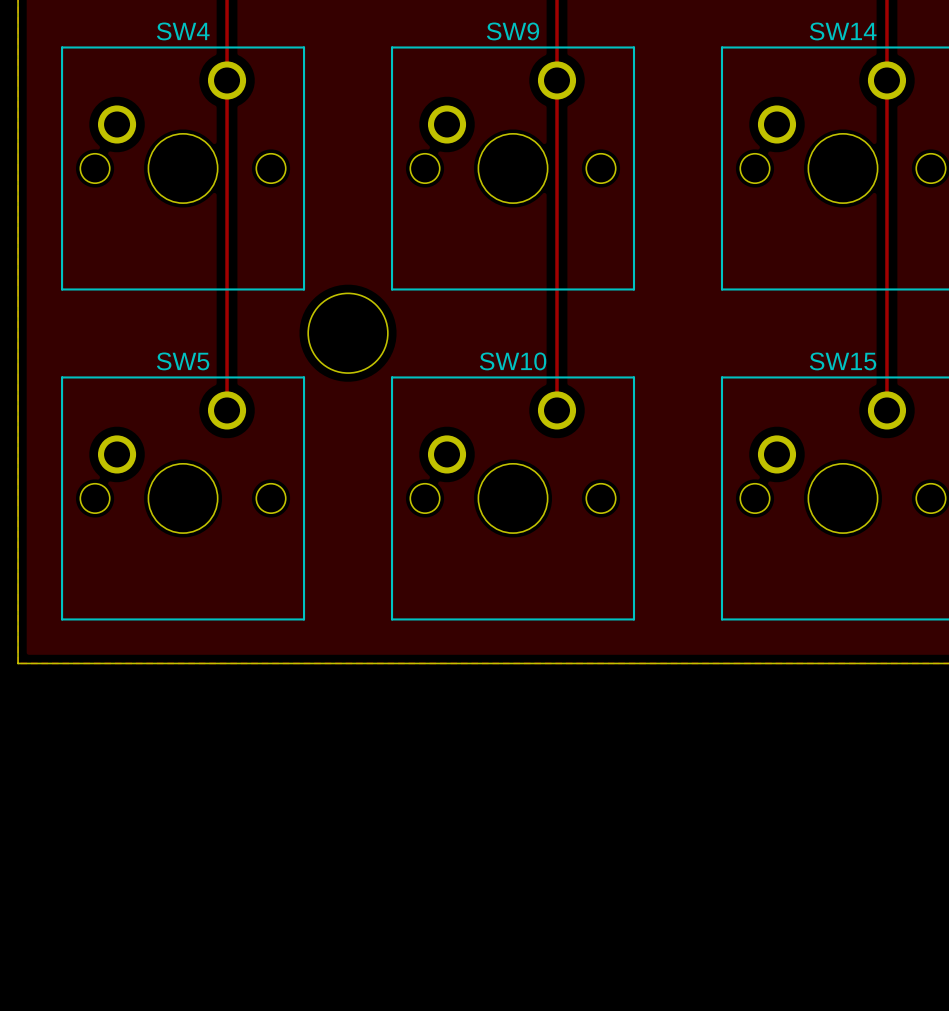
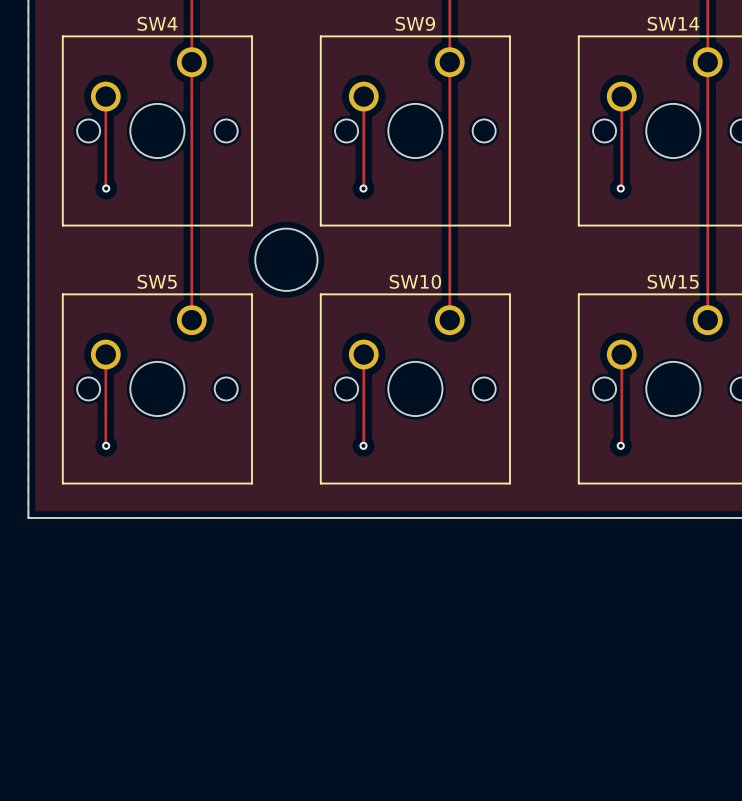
track: none -> (105, 96) (106, 188)
track: none -> (363, 96) (363, 188)
track: none -> (621, 96) (620, 188)
via: none -> (106, 188)
via: none -> (363, 188)
via: none -> (620, 188)
track: none -> (105, 354) (106, 445)
track: none -> (363, 354) (363, 445)
track: none -> (621, 354) (620, 445)
via: none -> (106, 445)
via: none -> (363, 445)
via: none -> (620, 445)

